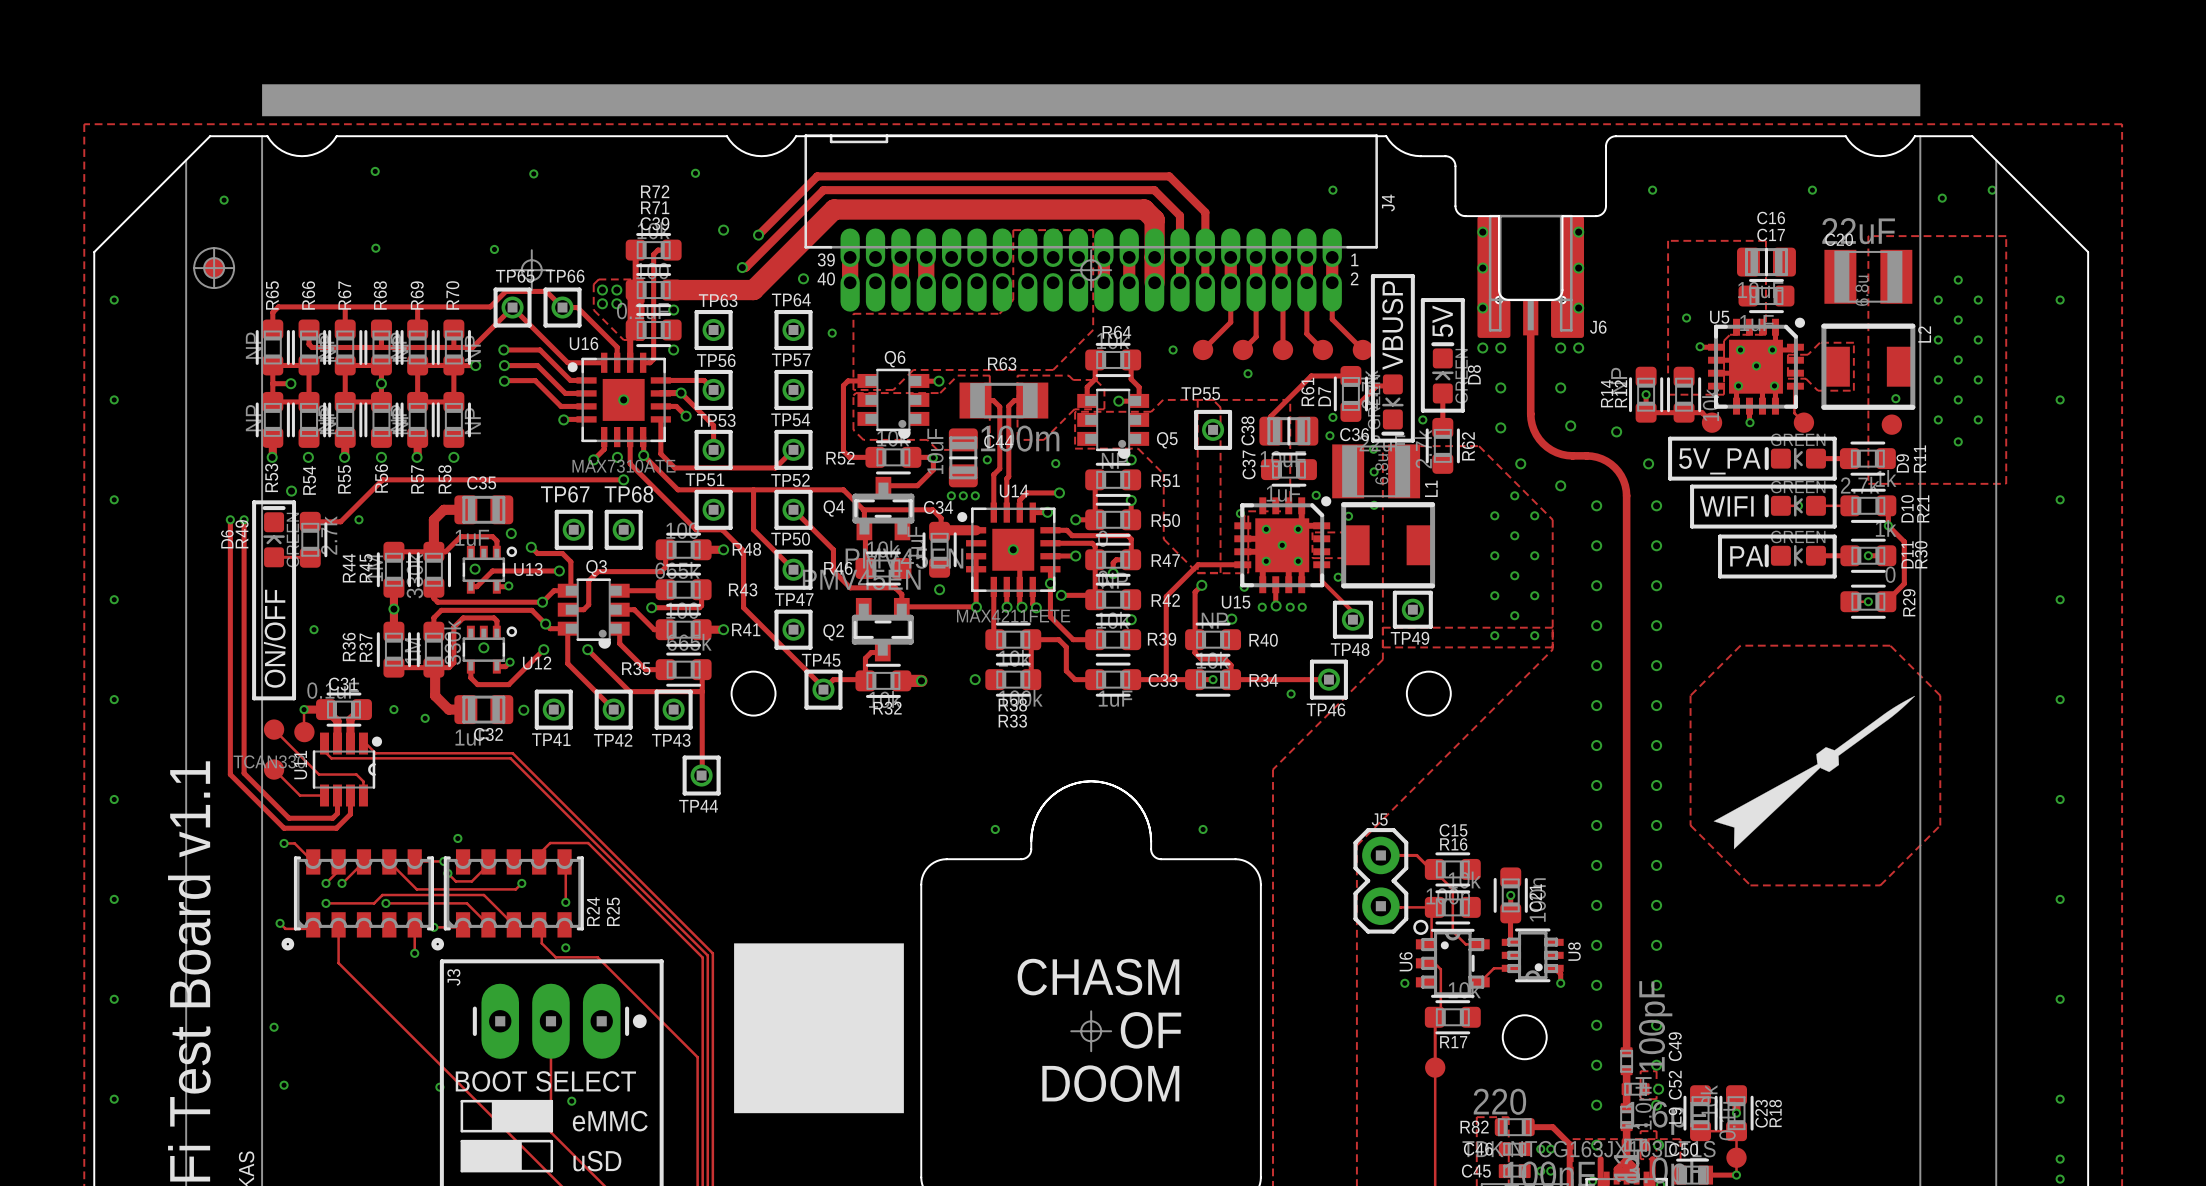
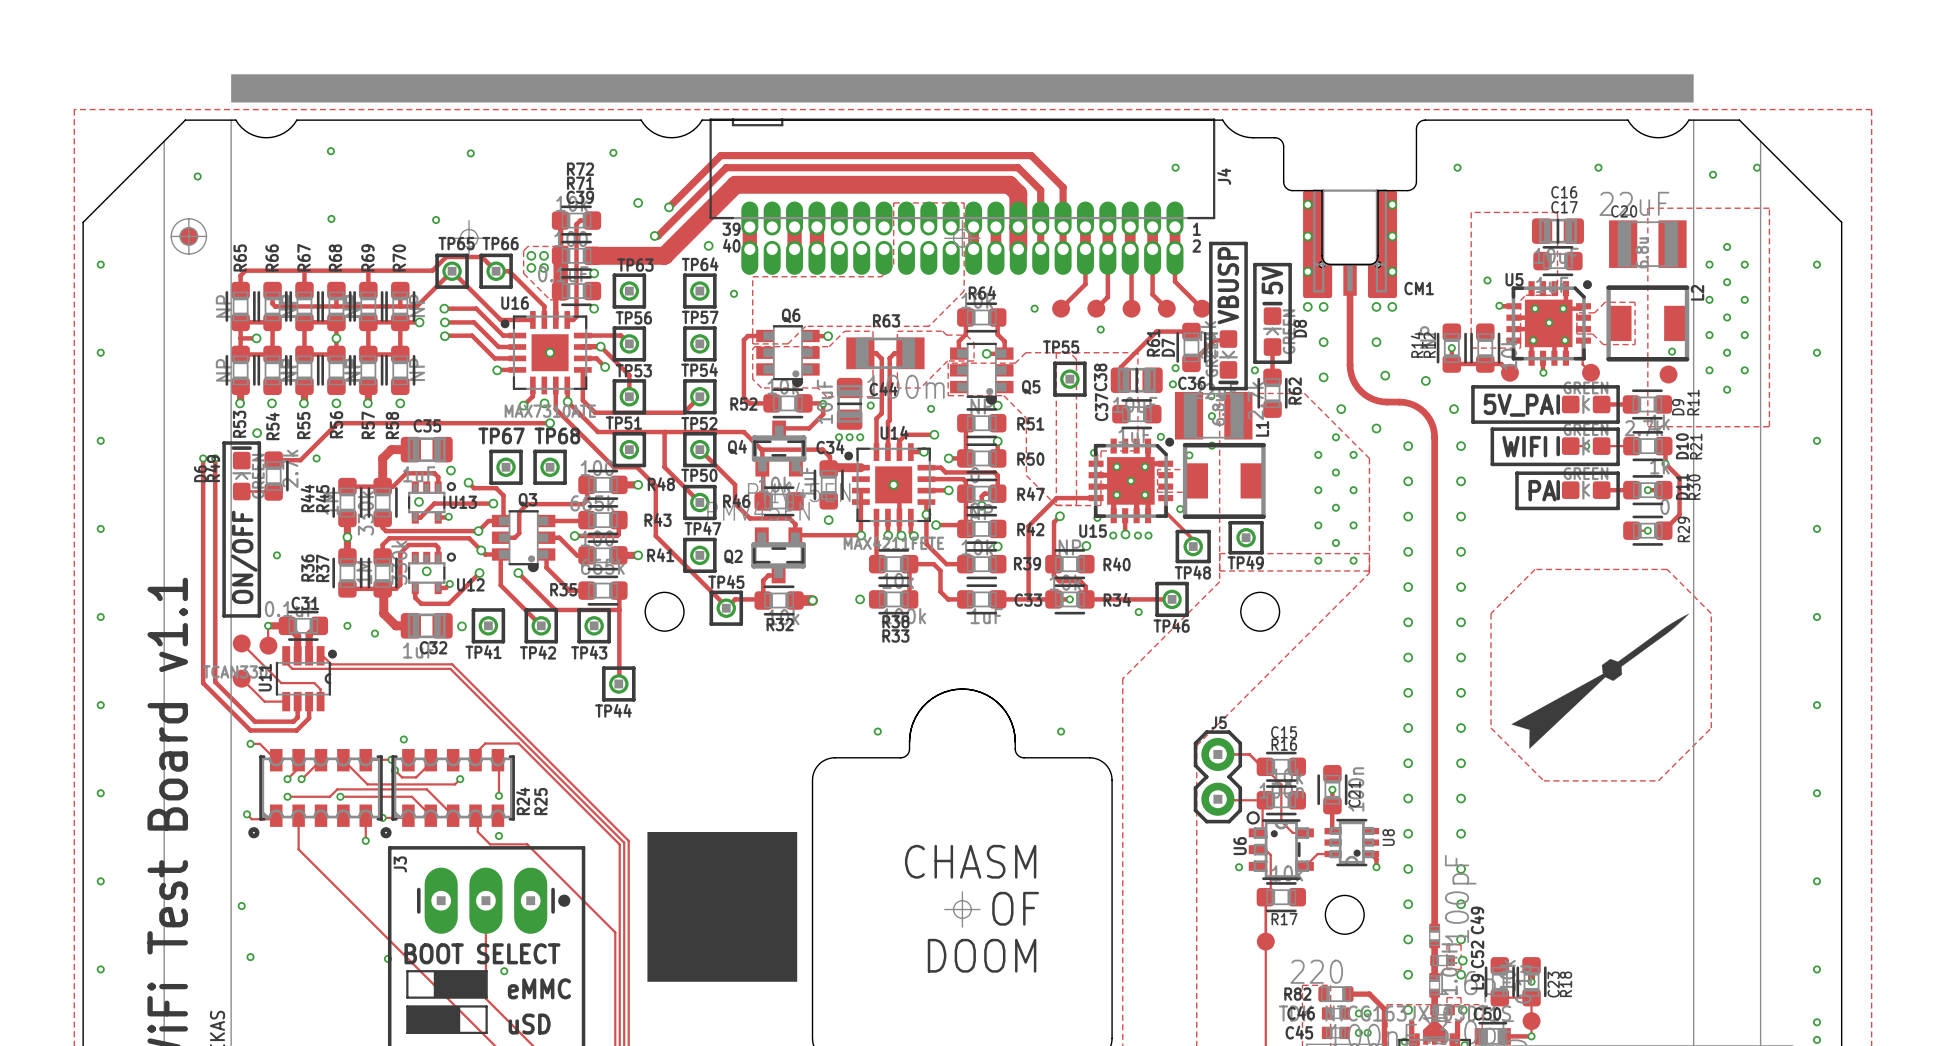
J6 name: J6 (1598, 327) -> CM1 (1419, 288)

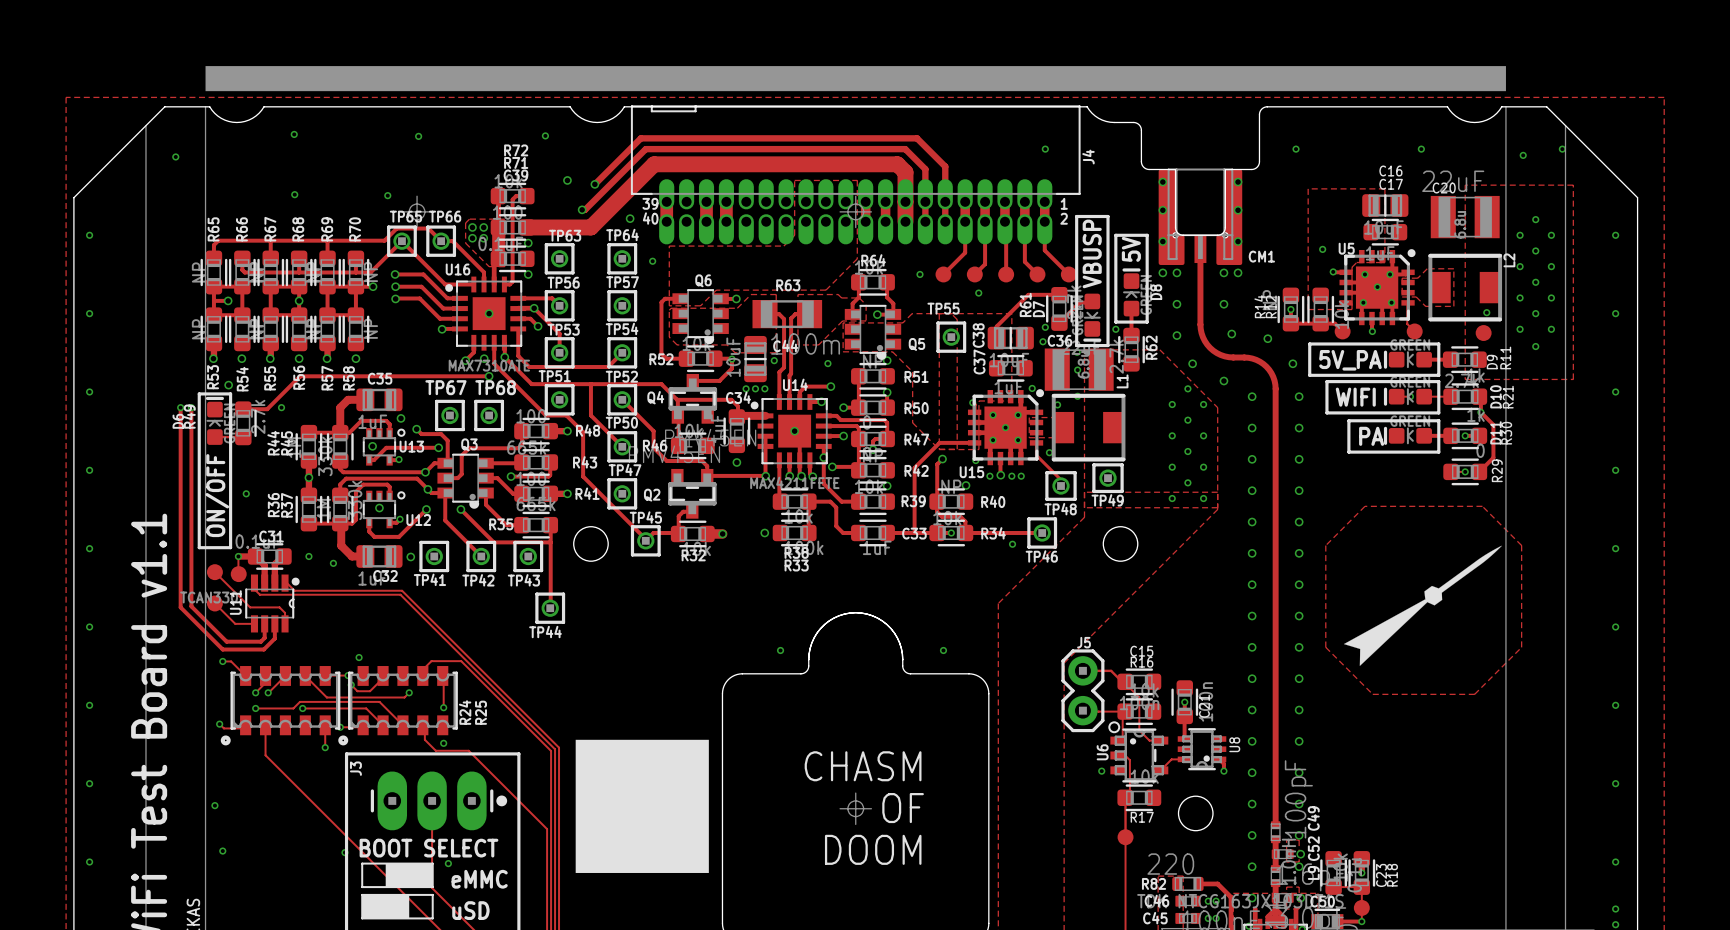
drawing: [170, 218, 207, 255] -> none

